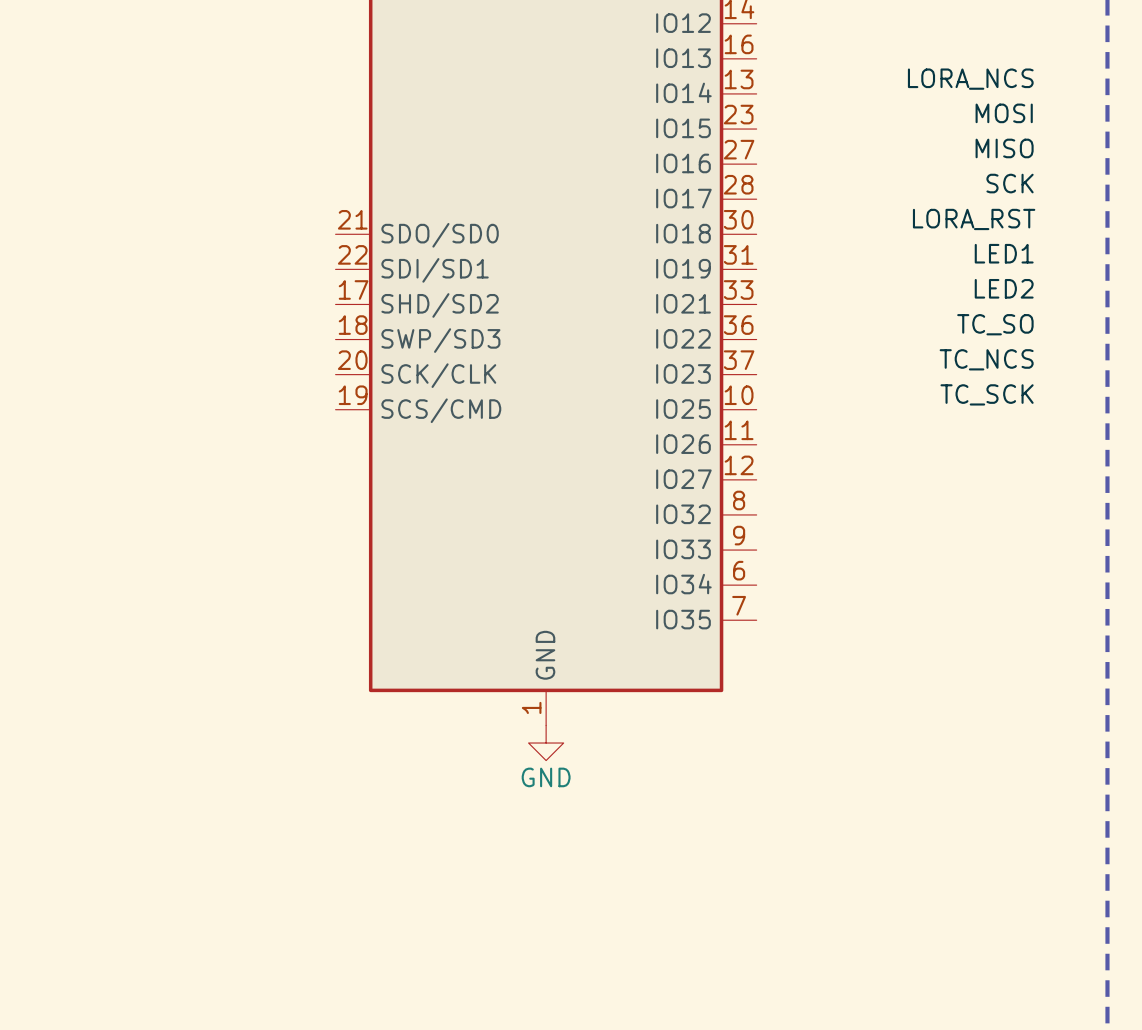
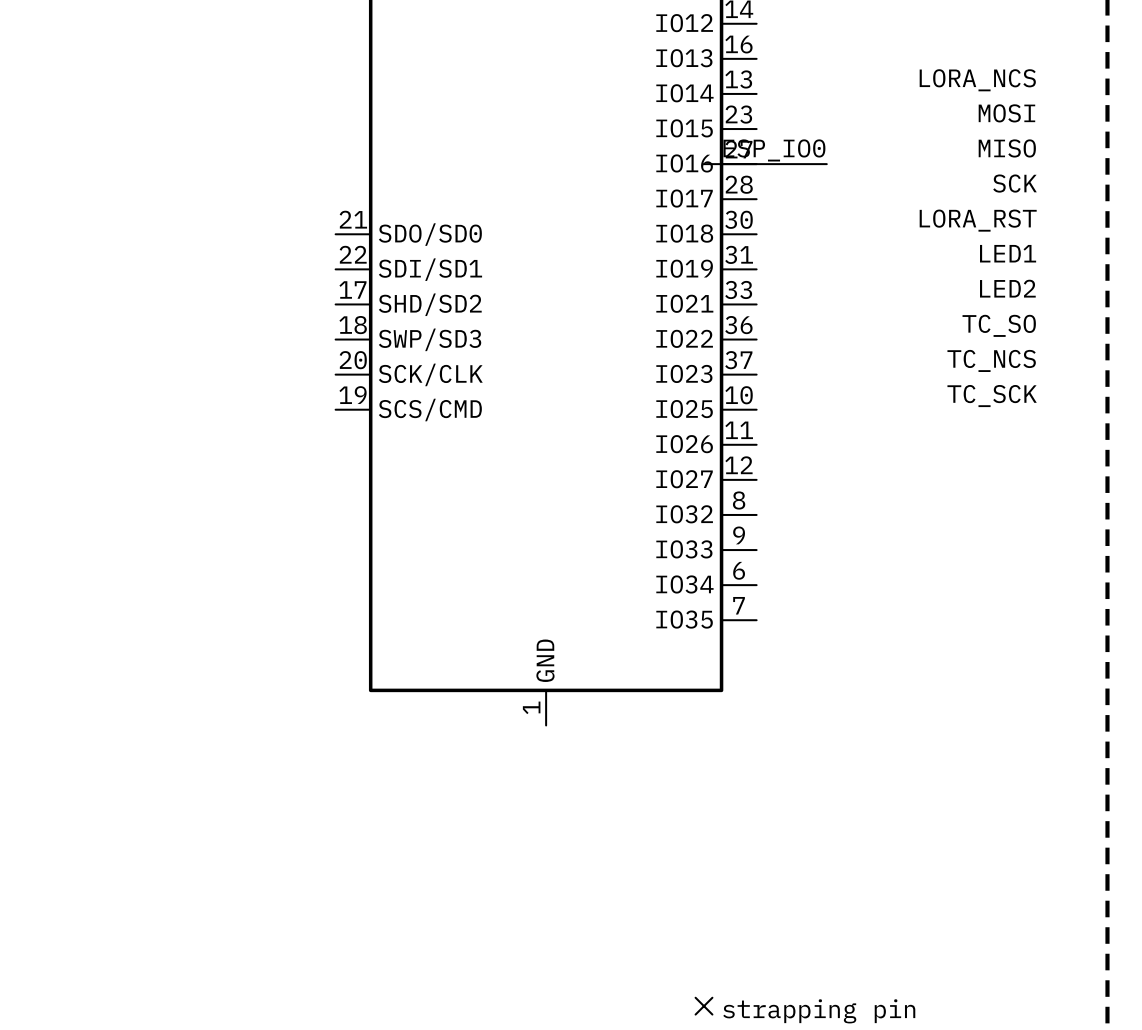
label: none -> ESP_IO0 (774, 150)
wire: none -> (704, 164) (826, 164)
power symbol: GND (546, 743) -> none
no-connect mark: none -> (704, 1006)
text: none -> strapping pin (819, 1011)

